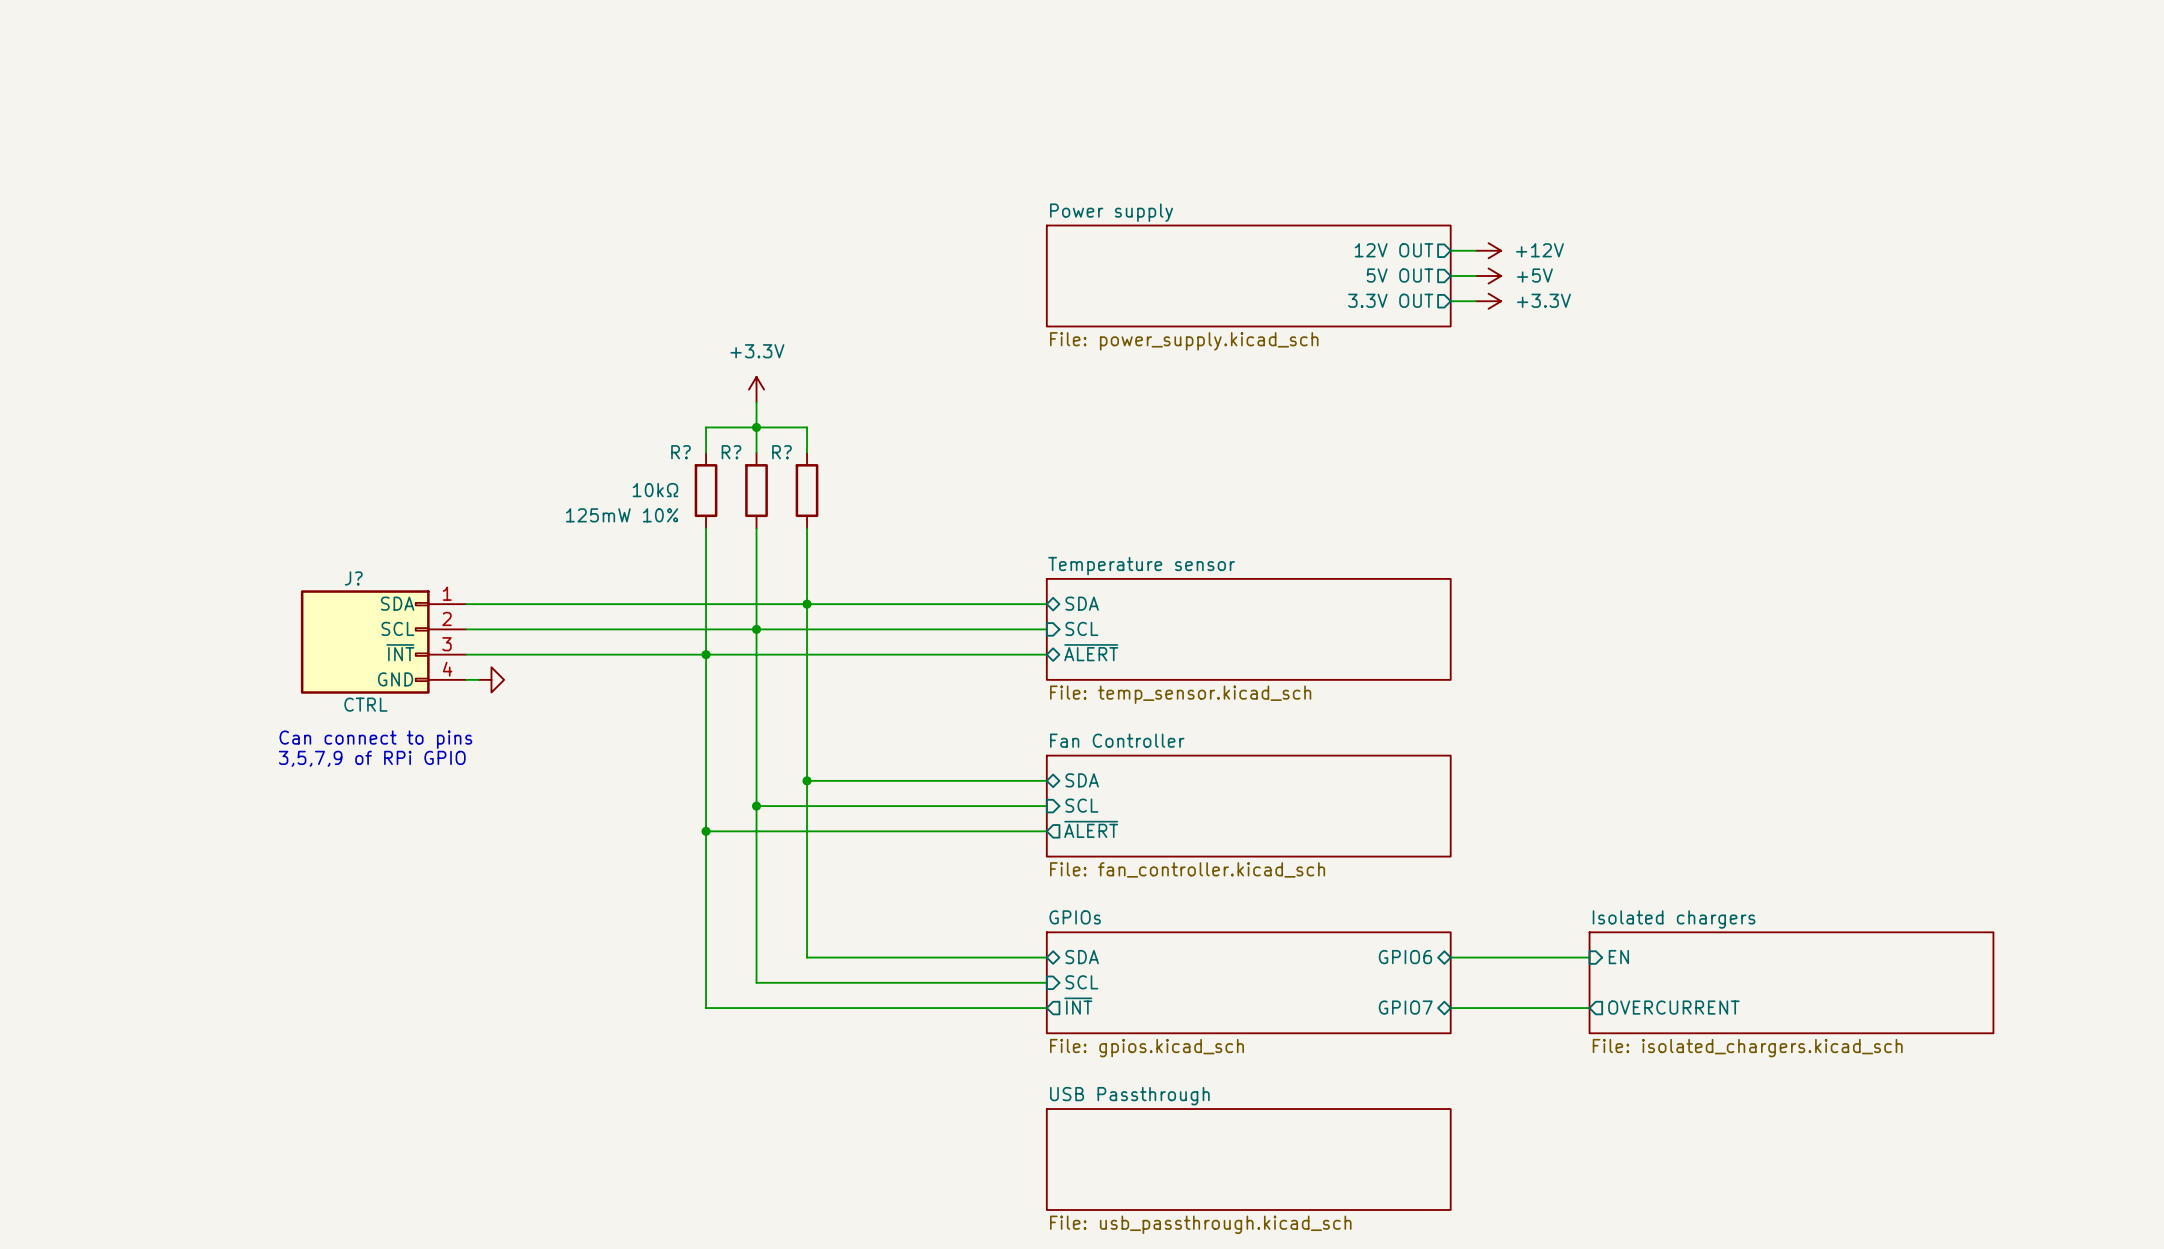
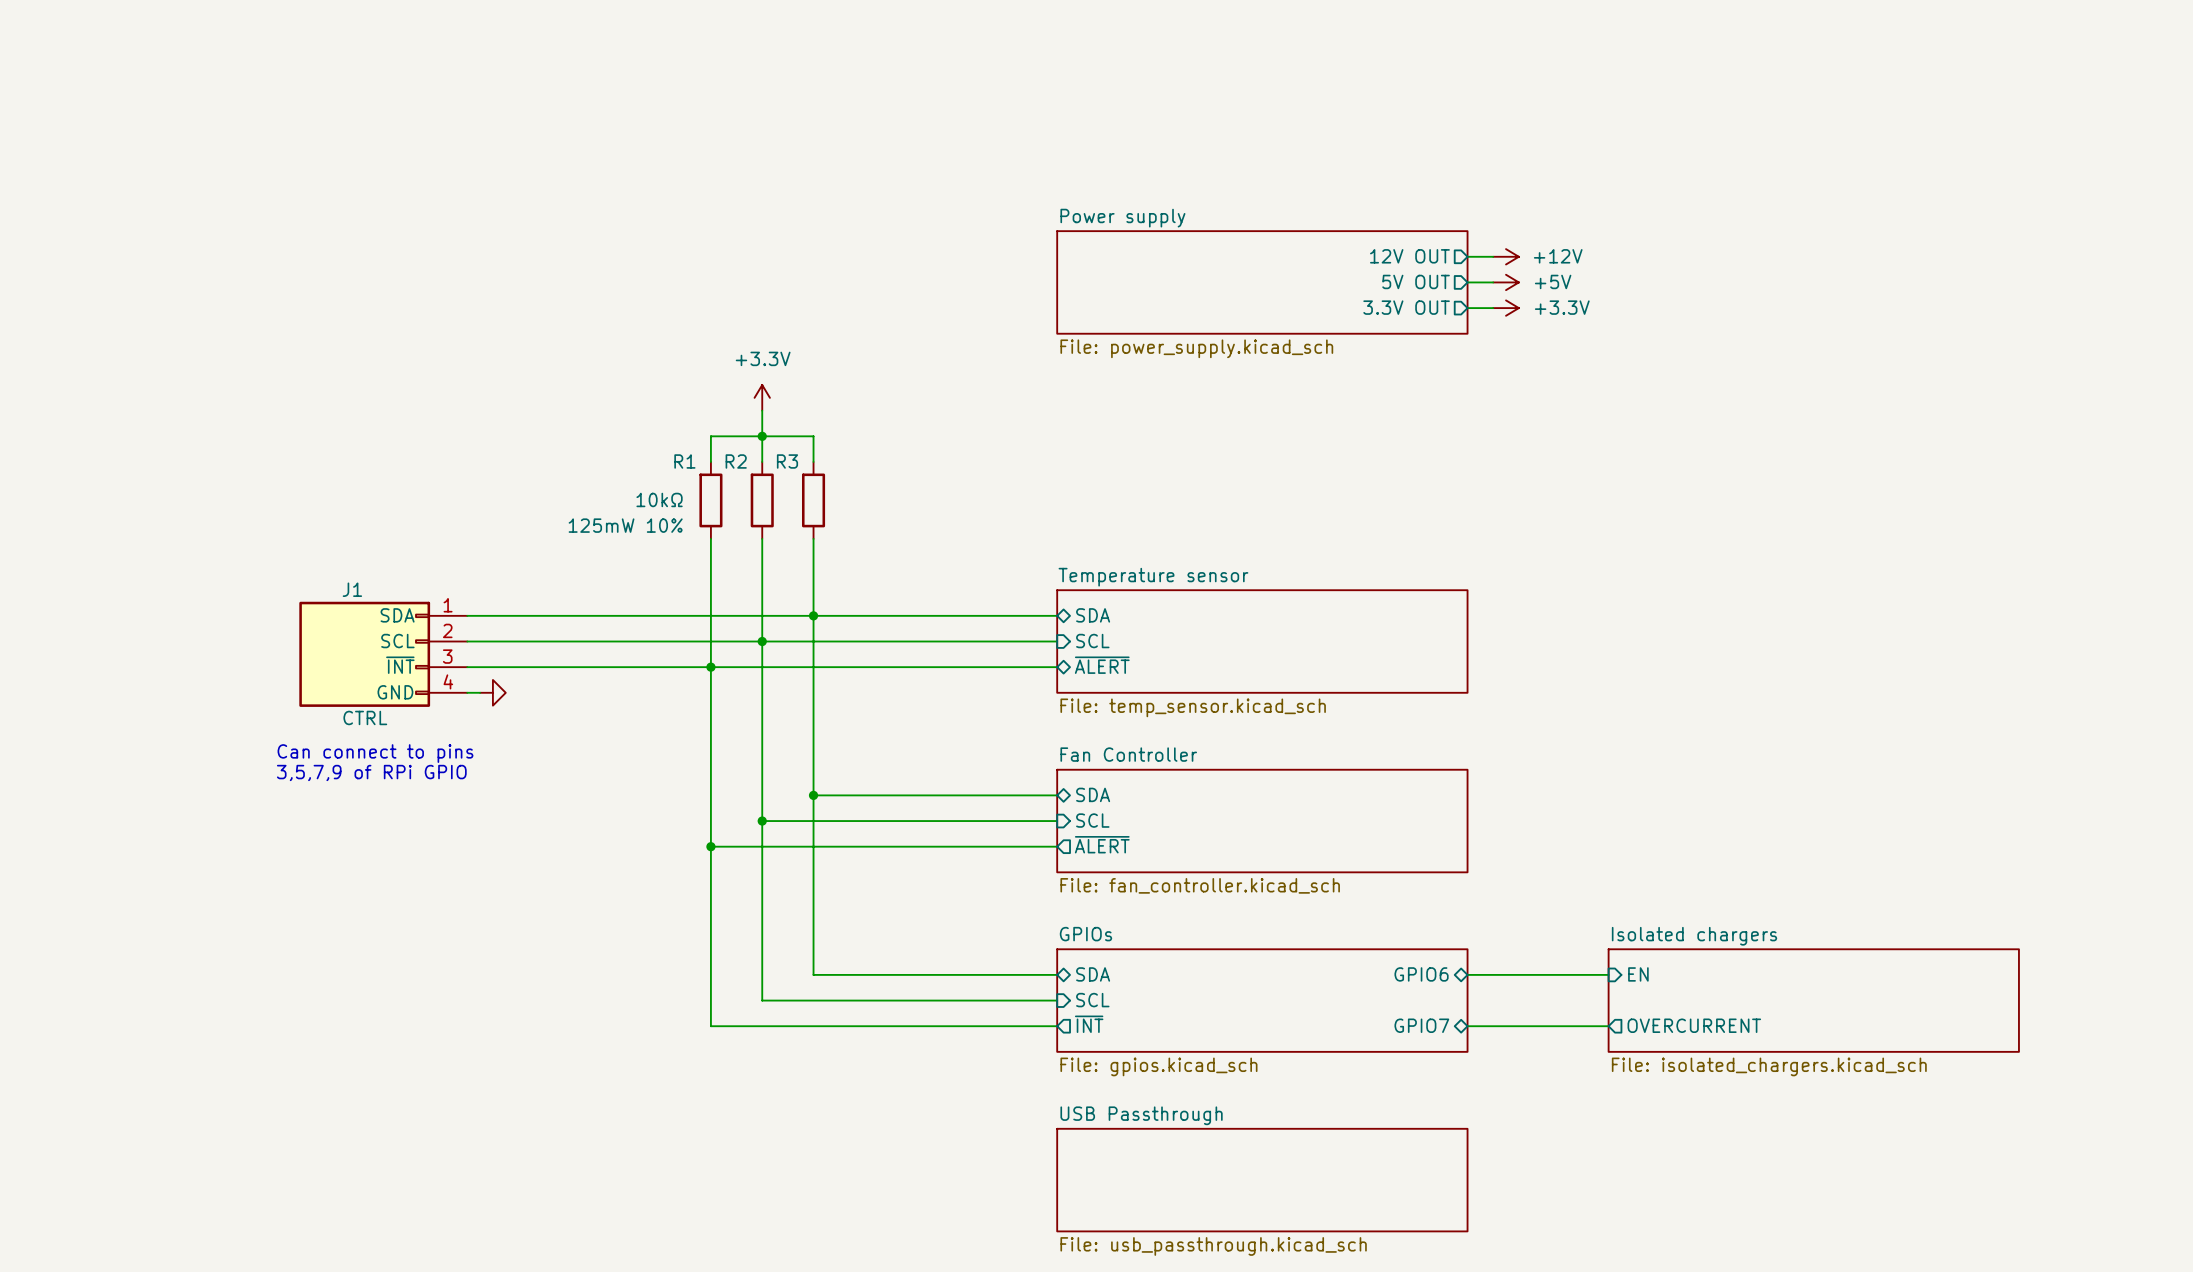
R? name: R? (681, 452) -> R1 (684, 461)
R? name: R? (731, 452) -> R2 (736, 461)
R? name: R? (781, 452) -> R3 (787, 461)
J? name: J? (353, 578) -> J1 (352, 589)

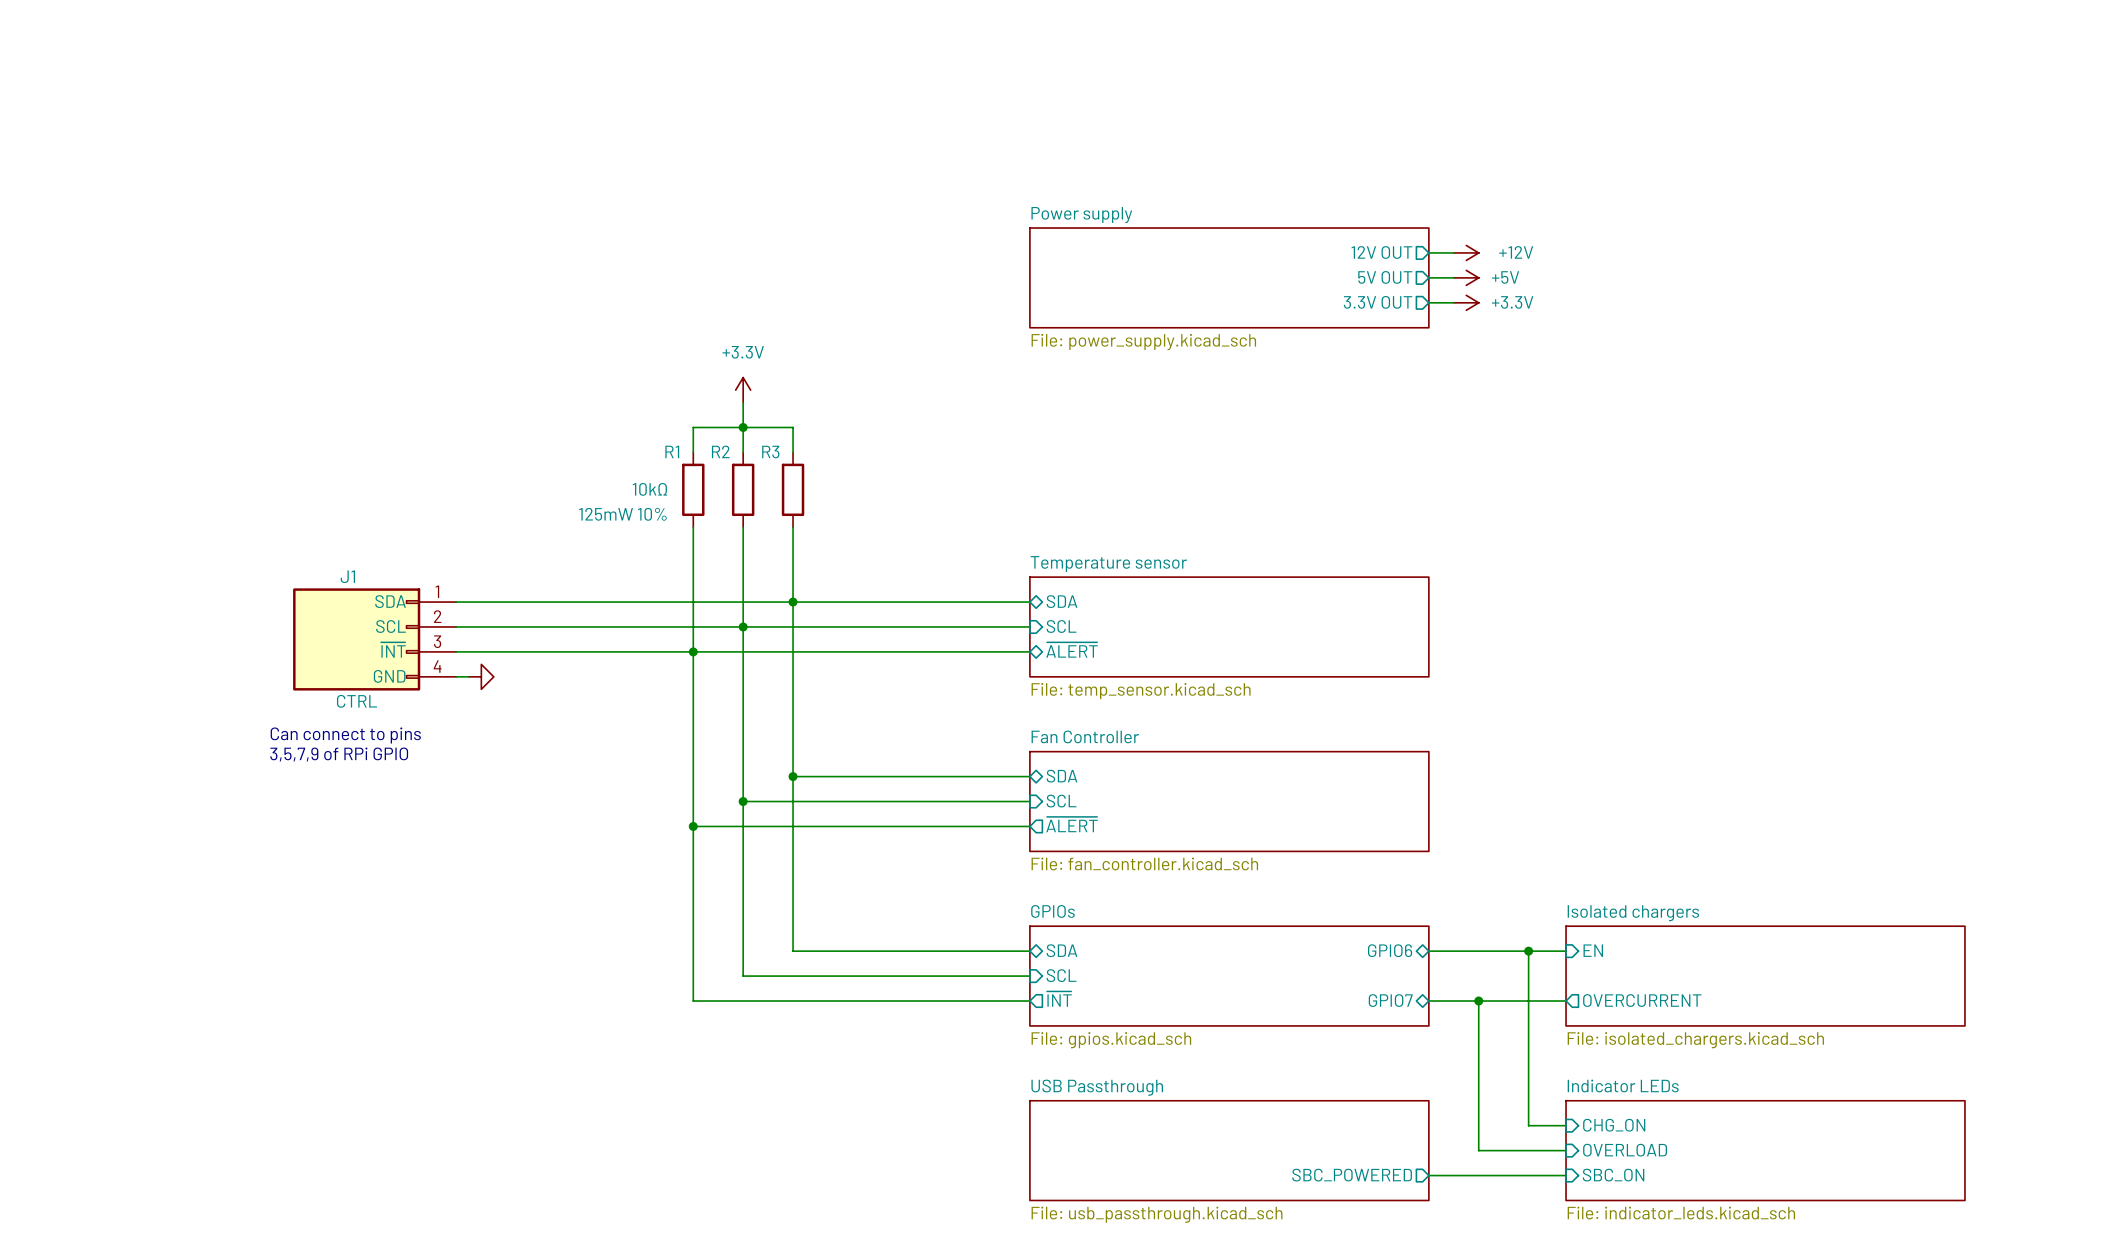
wire: none -> (1528, 951) (1528, 1125) (1566, 1125)
junction: none -> (1528, 951)
wire: none -> (1478, 1001) (1478, 1150) (1566, 1150)
junction: none -> (1478, 1001)
sheet pin: none -> CHG_ON (1614, 1125)
sheet pin: none -> OVERLOAD (1625, 1150)
sheet Indicator LEDs: none -> File: indicator_leds.kicad_sch (1765, 1150)
sheet pin: none -> SBC_POWERED (1352, 1175)
wire: none -> (1428, 1175) (1566, 1175)
sheet pin: none -> SBC_ON (1613, 1175)

